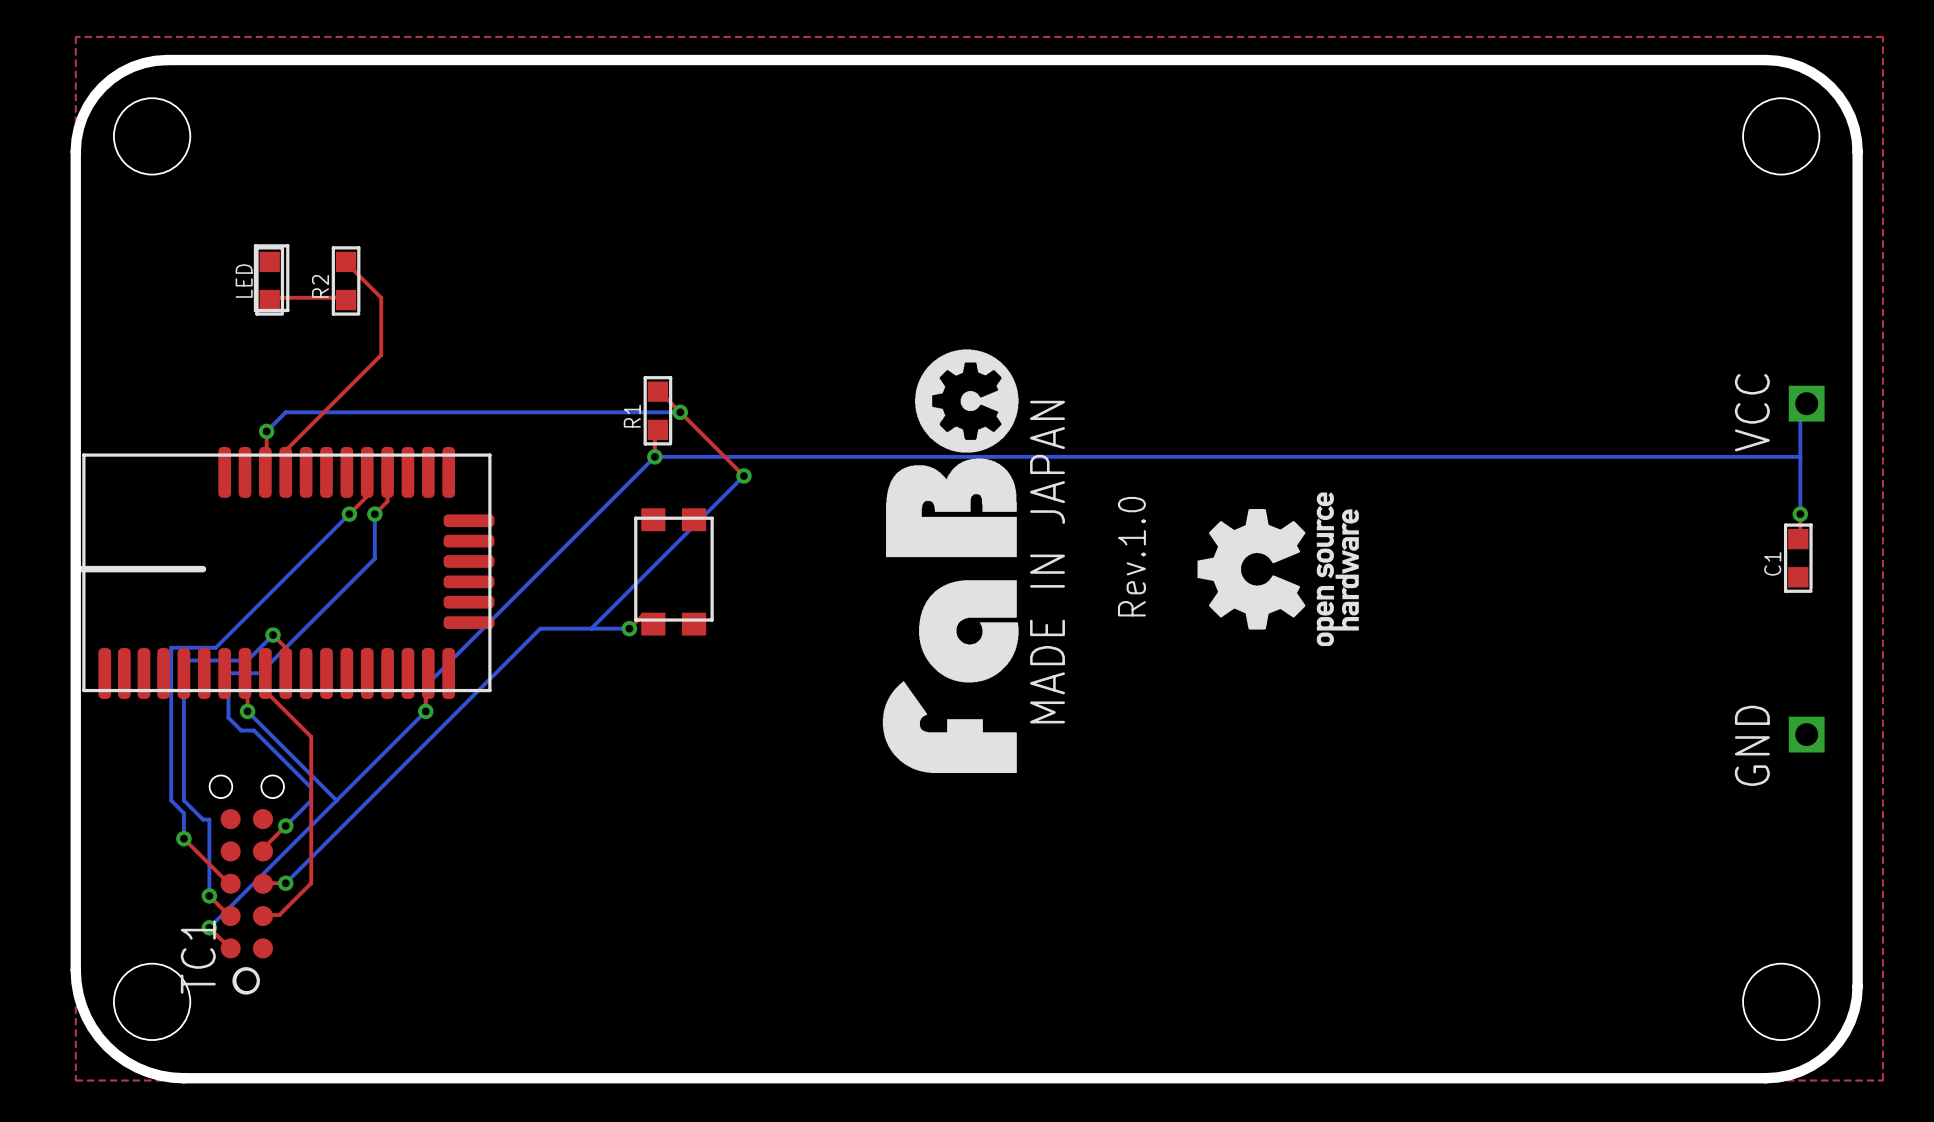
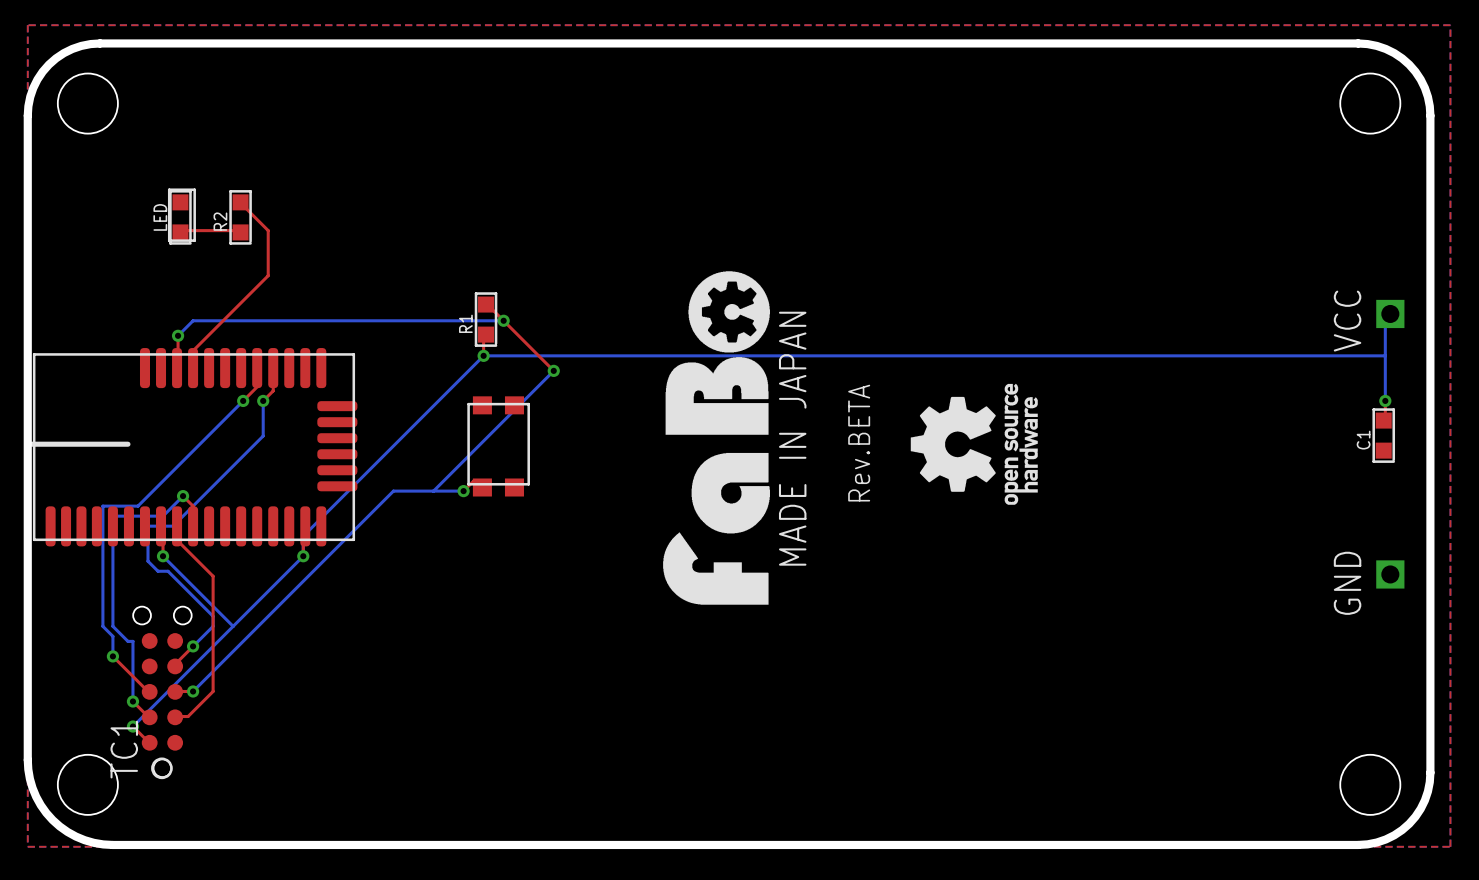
text: Rev.1.0 (1131, 556) -> Rev.BETA (859, 443)

